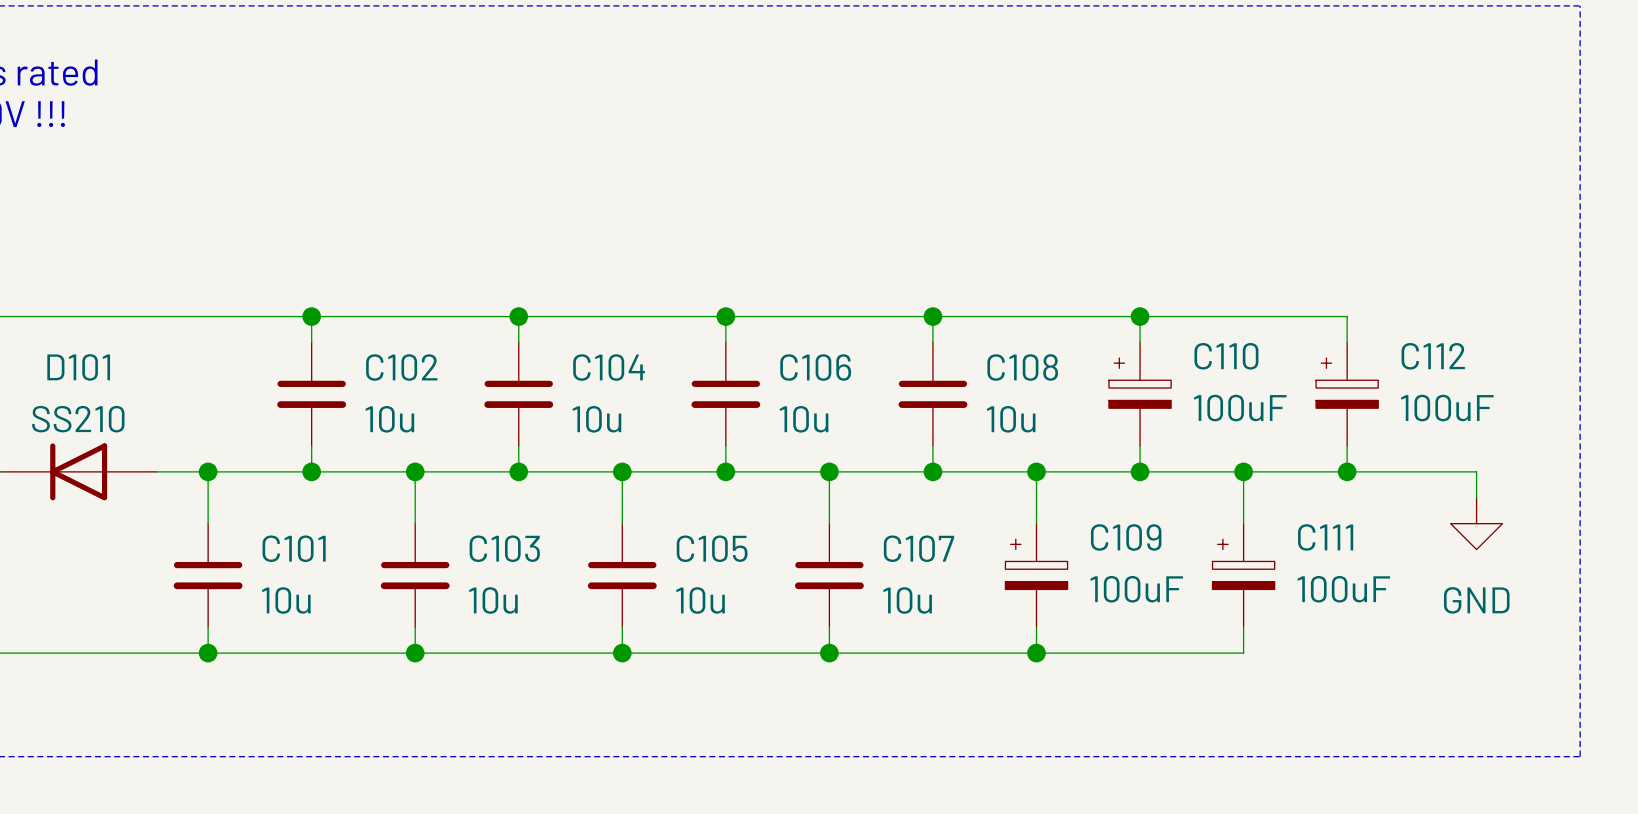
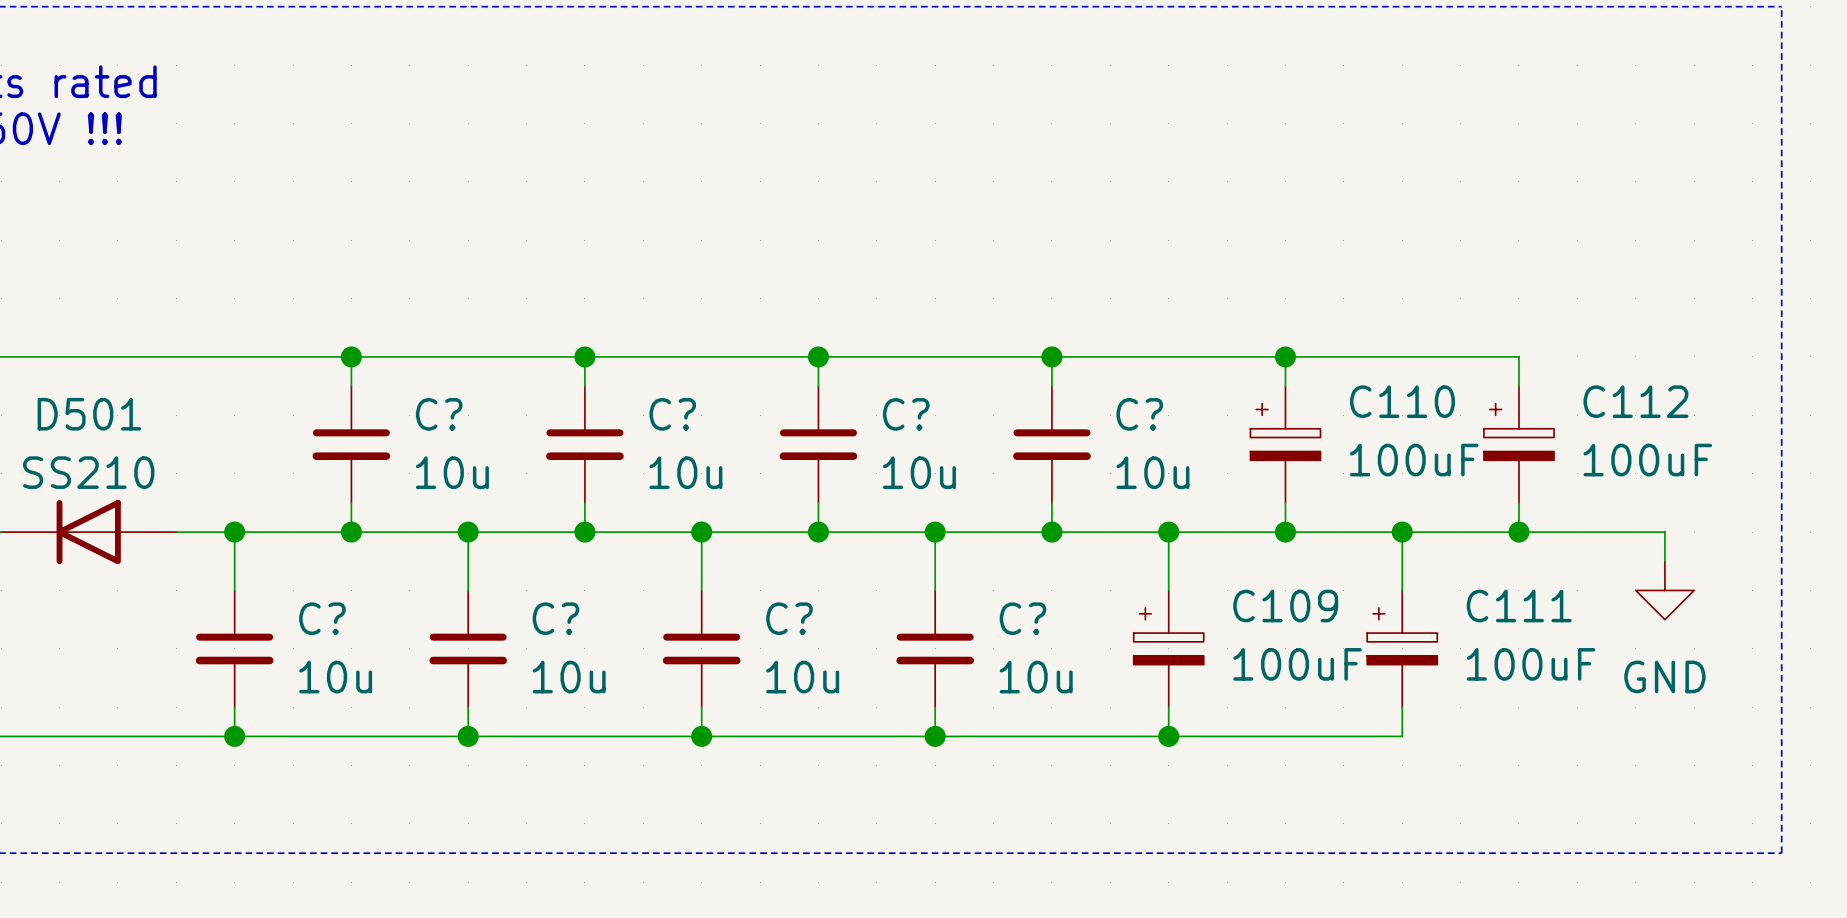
D101 name: D101 (78, 367) -> D501 (89, 414)
C102 name: C102 (401, 367) -> C? (439, 414)
C104 name: C104 (609, 367) -> C? (672, 414)
C106 name: C106 (815, 367) -> C? (906, 414)
C108 name: C108 (1022, 367) -> C? (1139, 414)
C101 name: C101 (294, 548) -> C? (322, 618)
C103 name: C103 (504, 548) -> C? (555, 618)
C105 name: C105 (712, 548) -> C? (789, 618)
C107 name: C107 (918, 548) -> C? (1022, 618)

